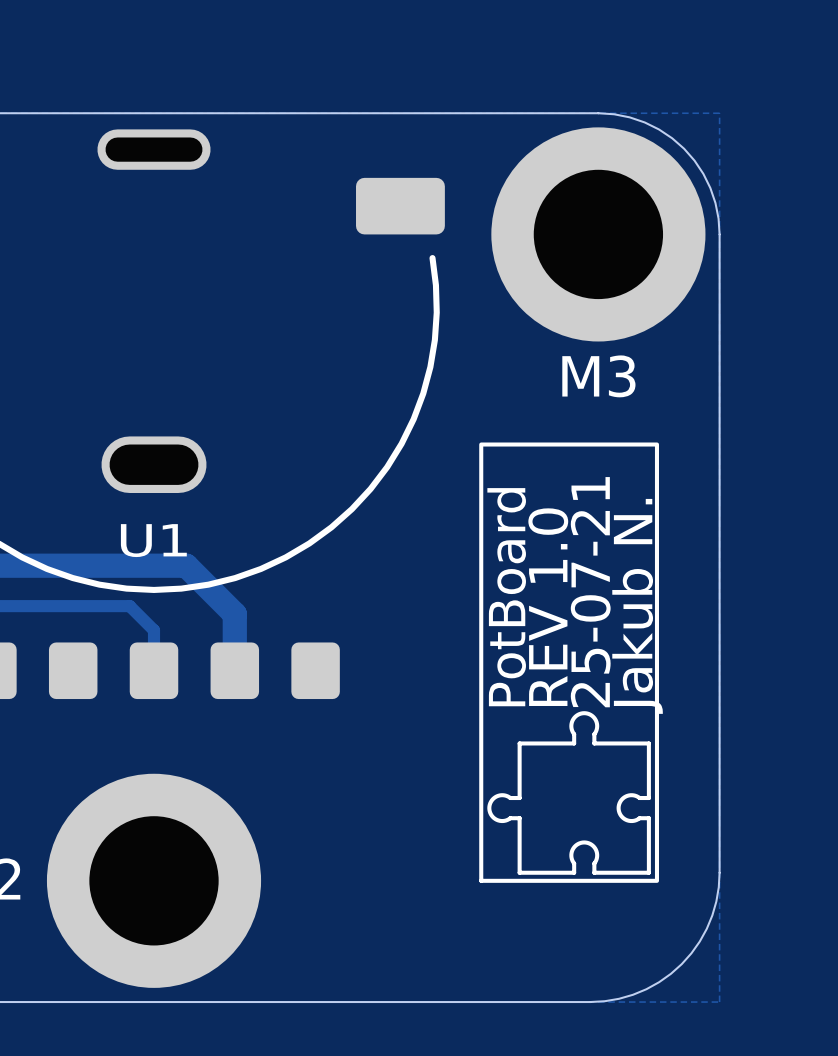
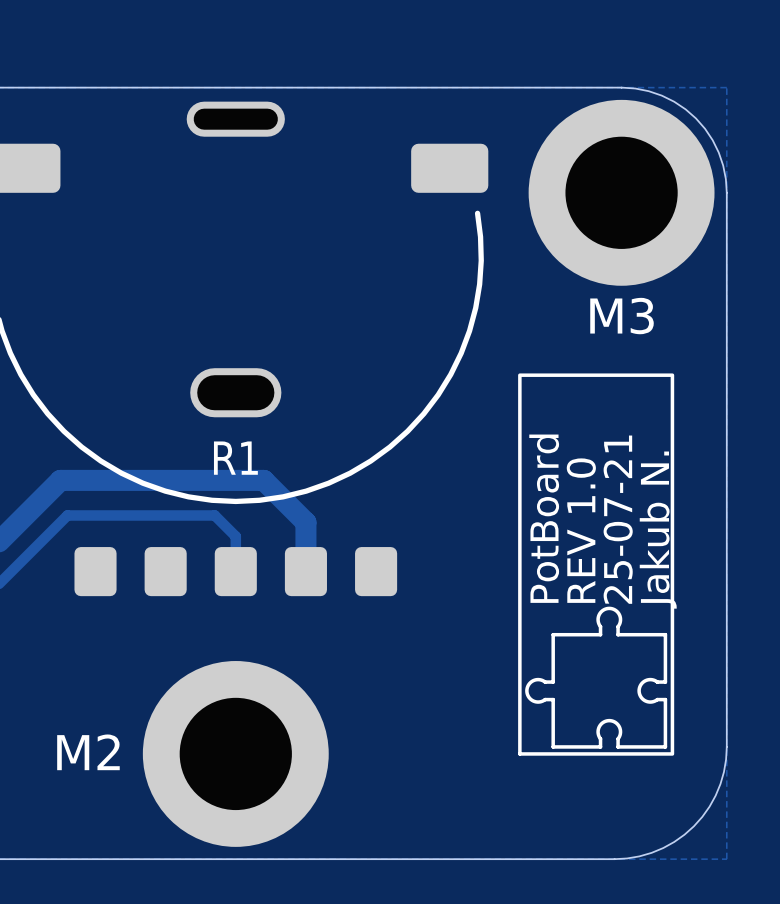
drawing shape: [479, 442, 663, 883] -> [518, 373, 677, 756]
U1 name: U1 (153, 540) -> R1 (235, 458)

